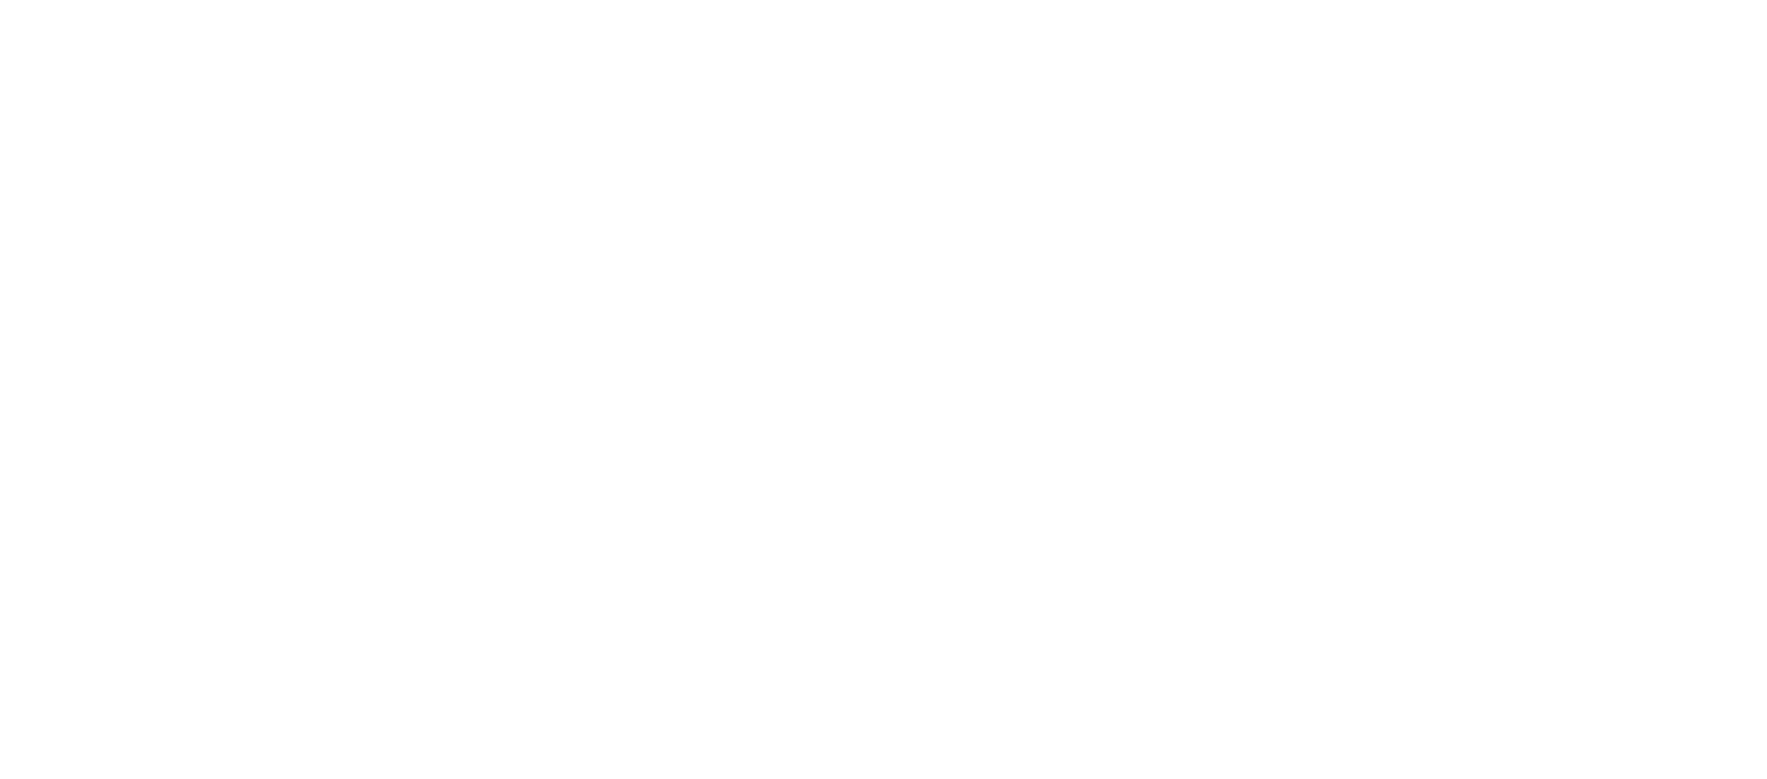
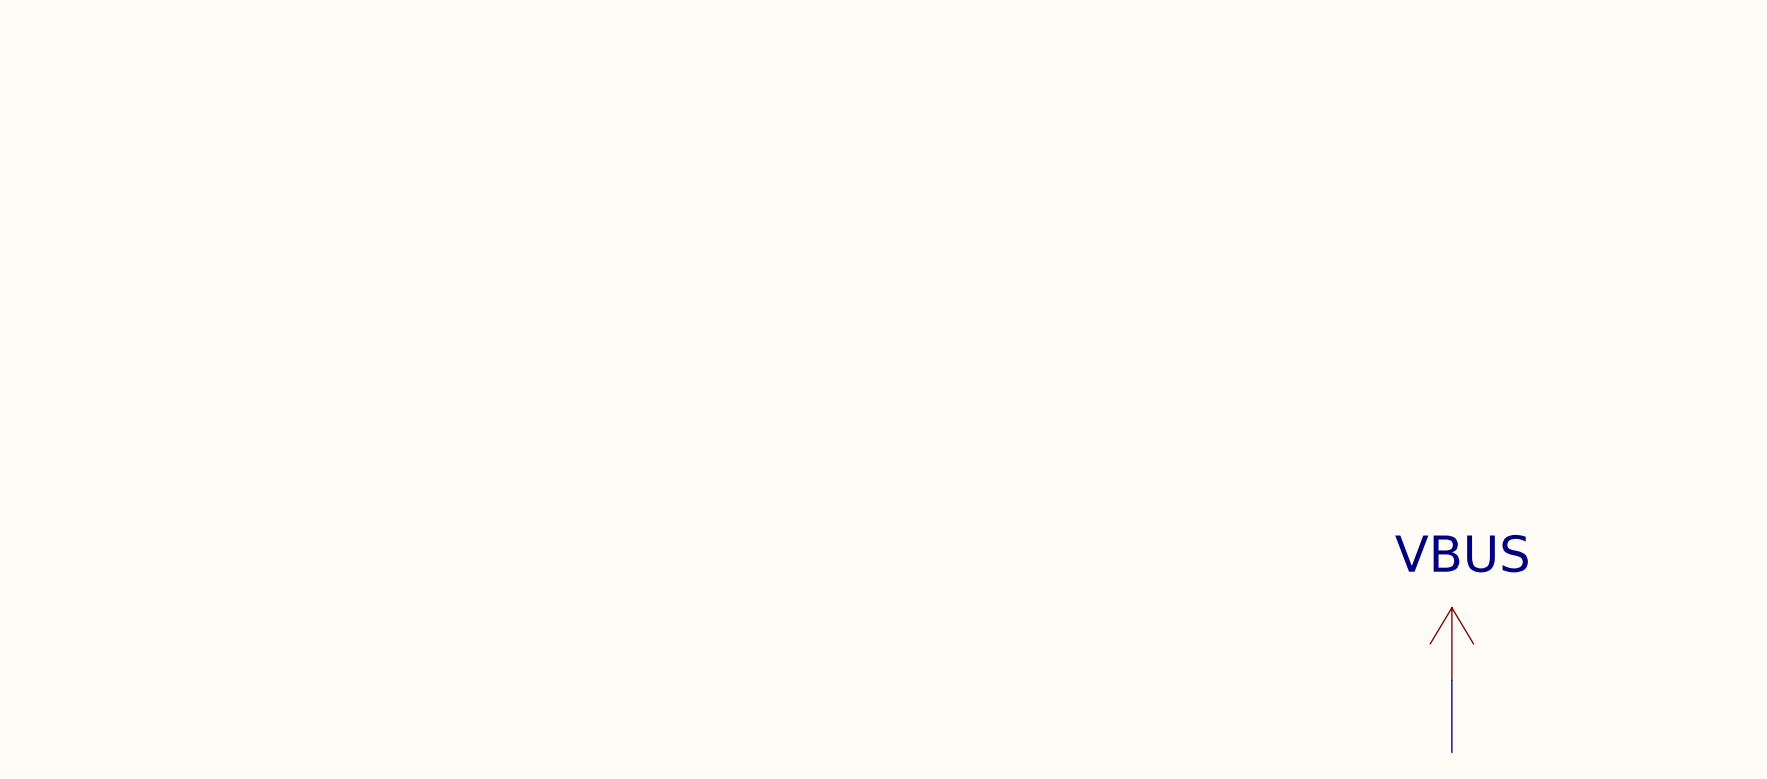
power symbol: none -> VBUS (1451, 643)
wire: none -> (1451, 680) (1451, 752)

